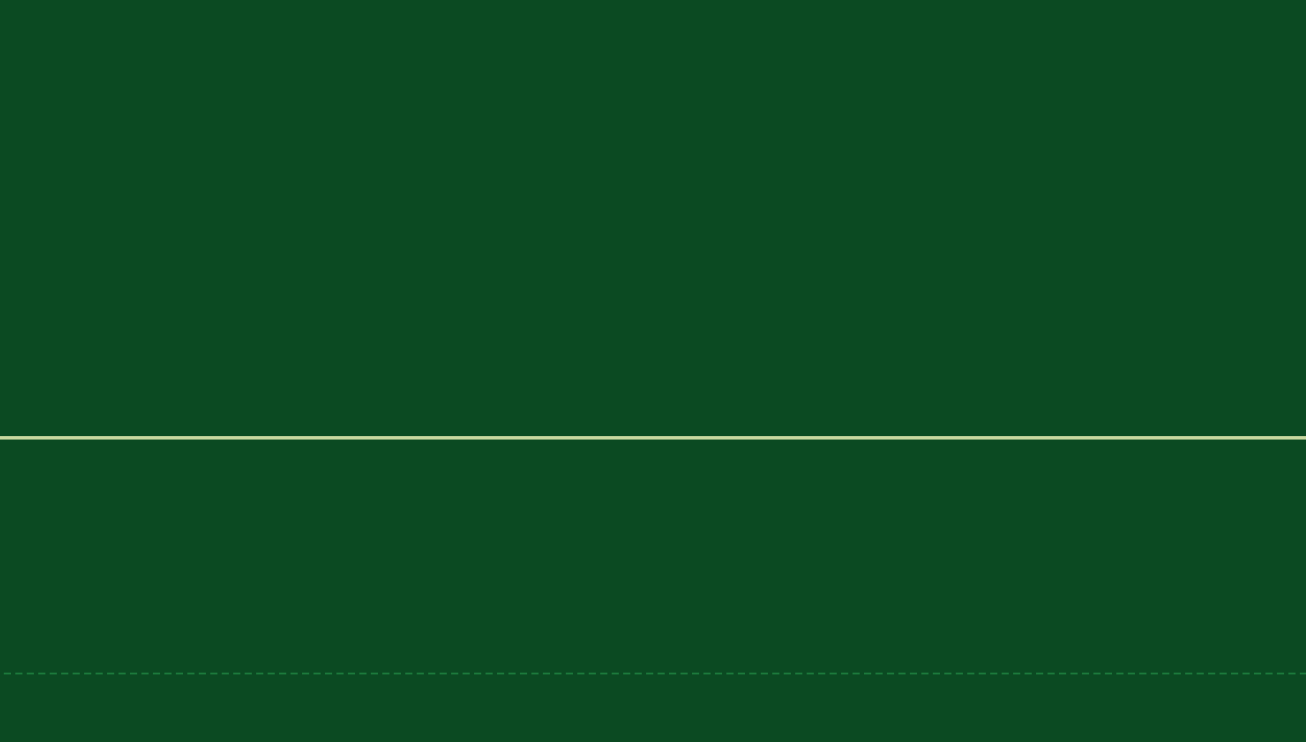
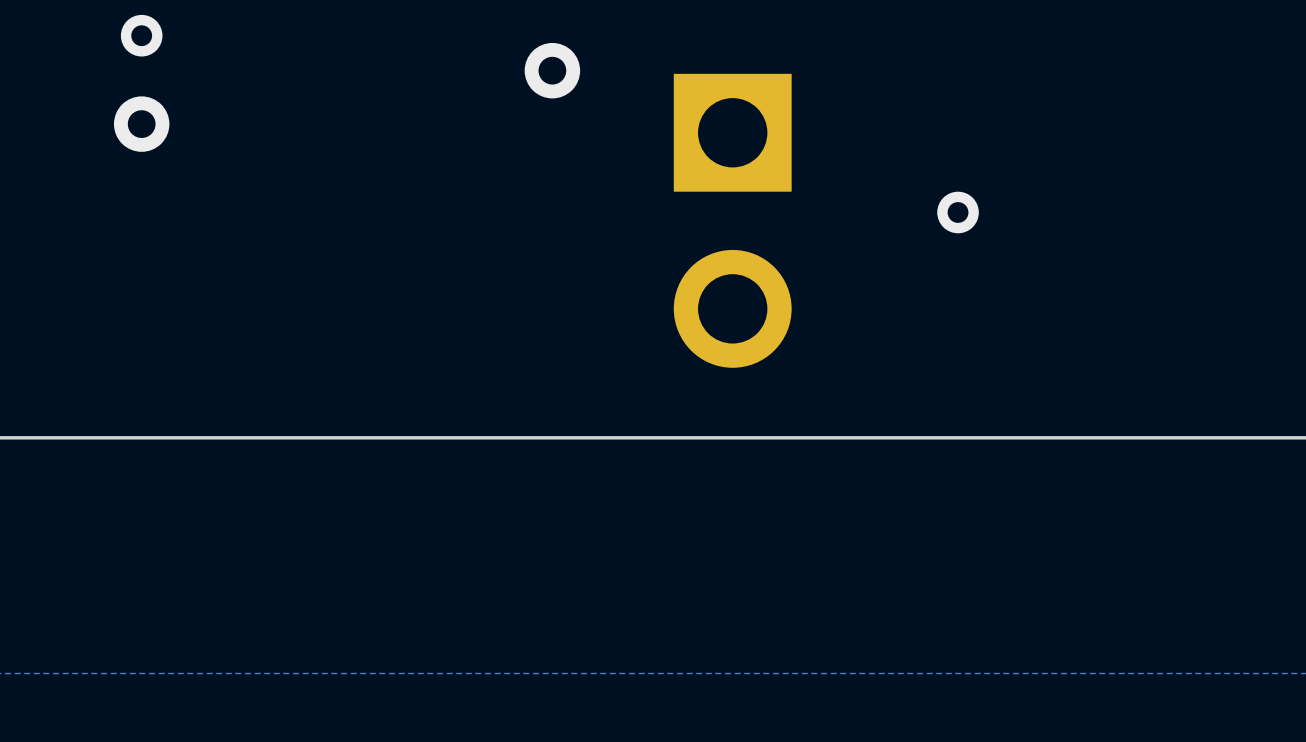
via: none -> (141, 35)
via: none -> (552, 70)
via: none -> (141, 124)
via: none -> (958, 212)
part: none -> (732, 220)

